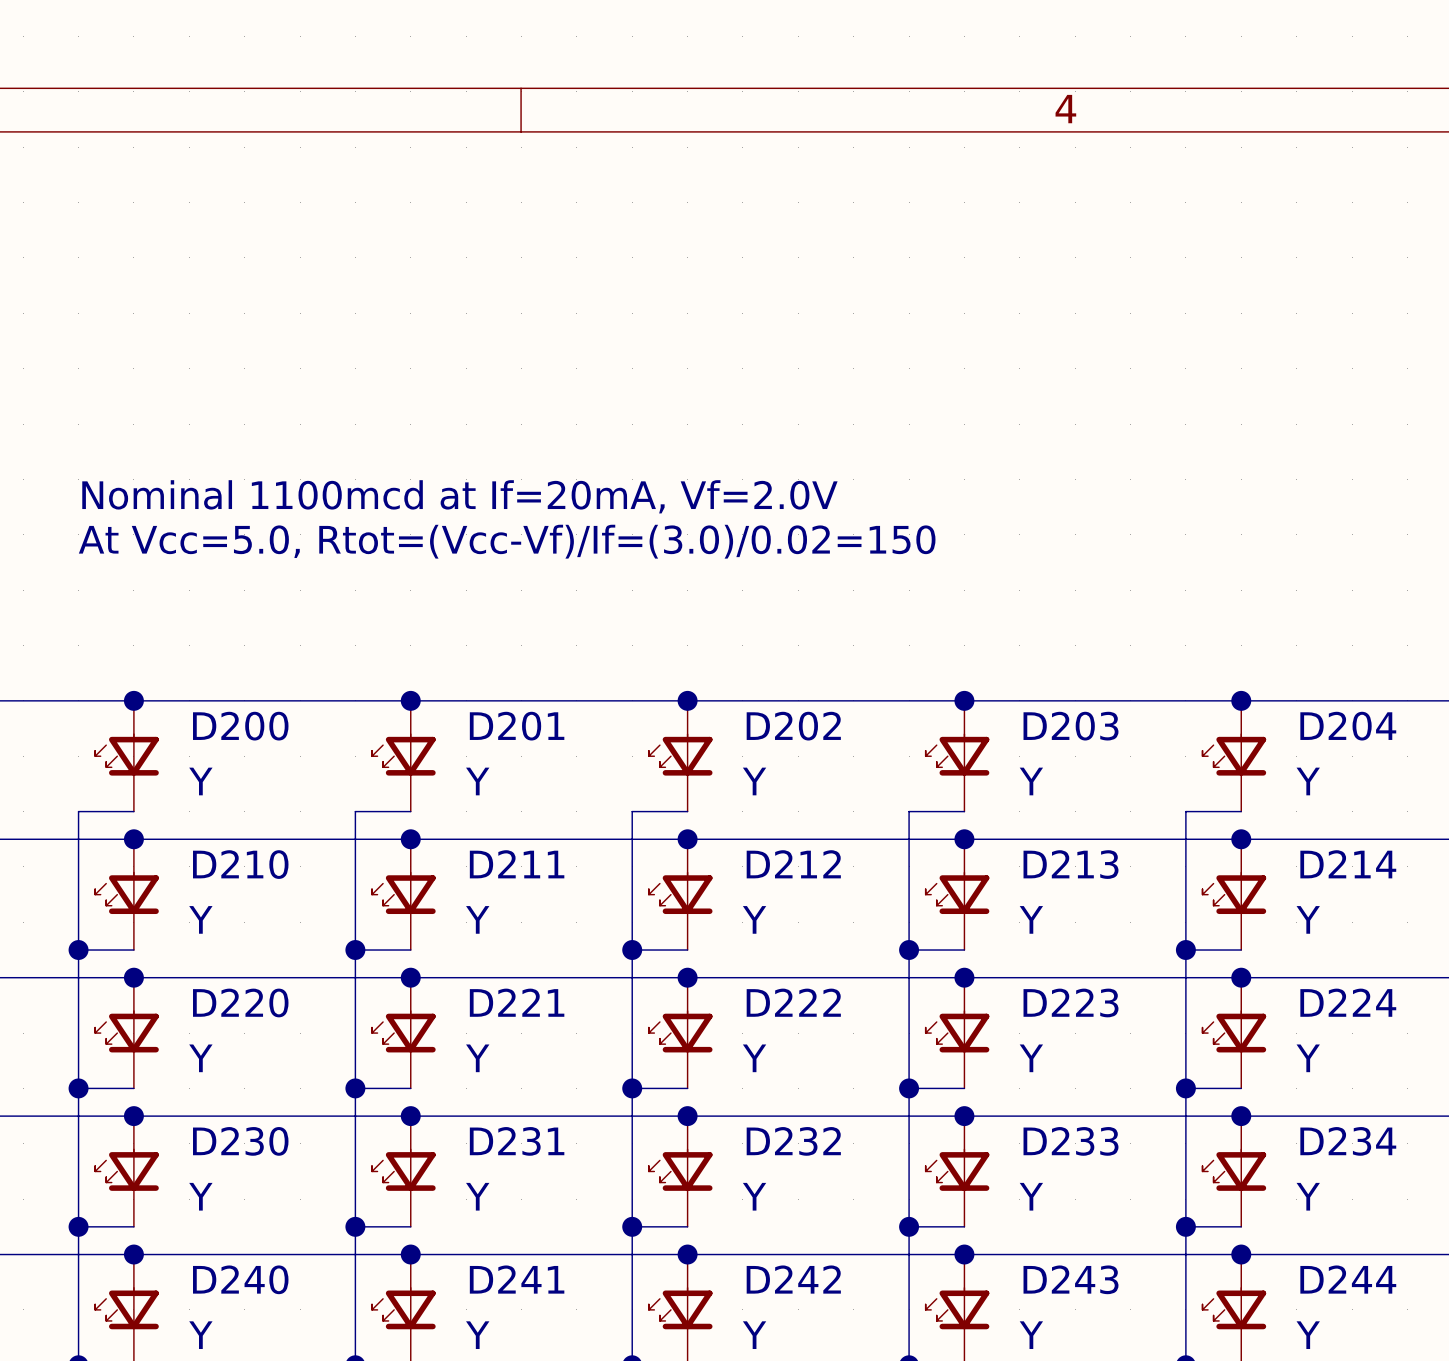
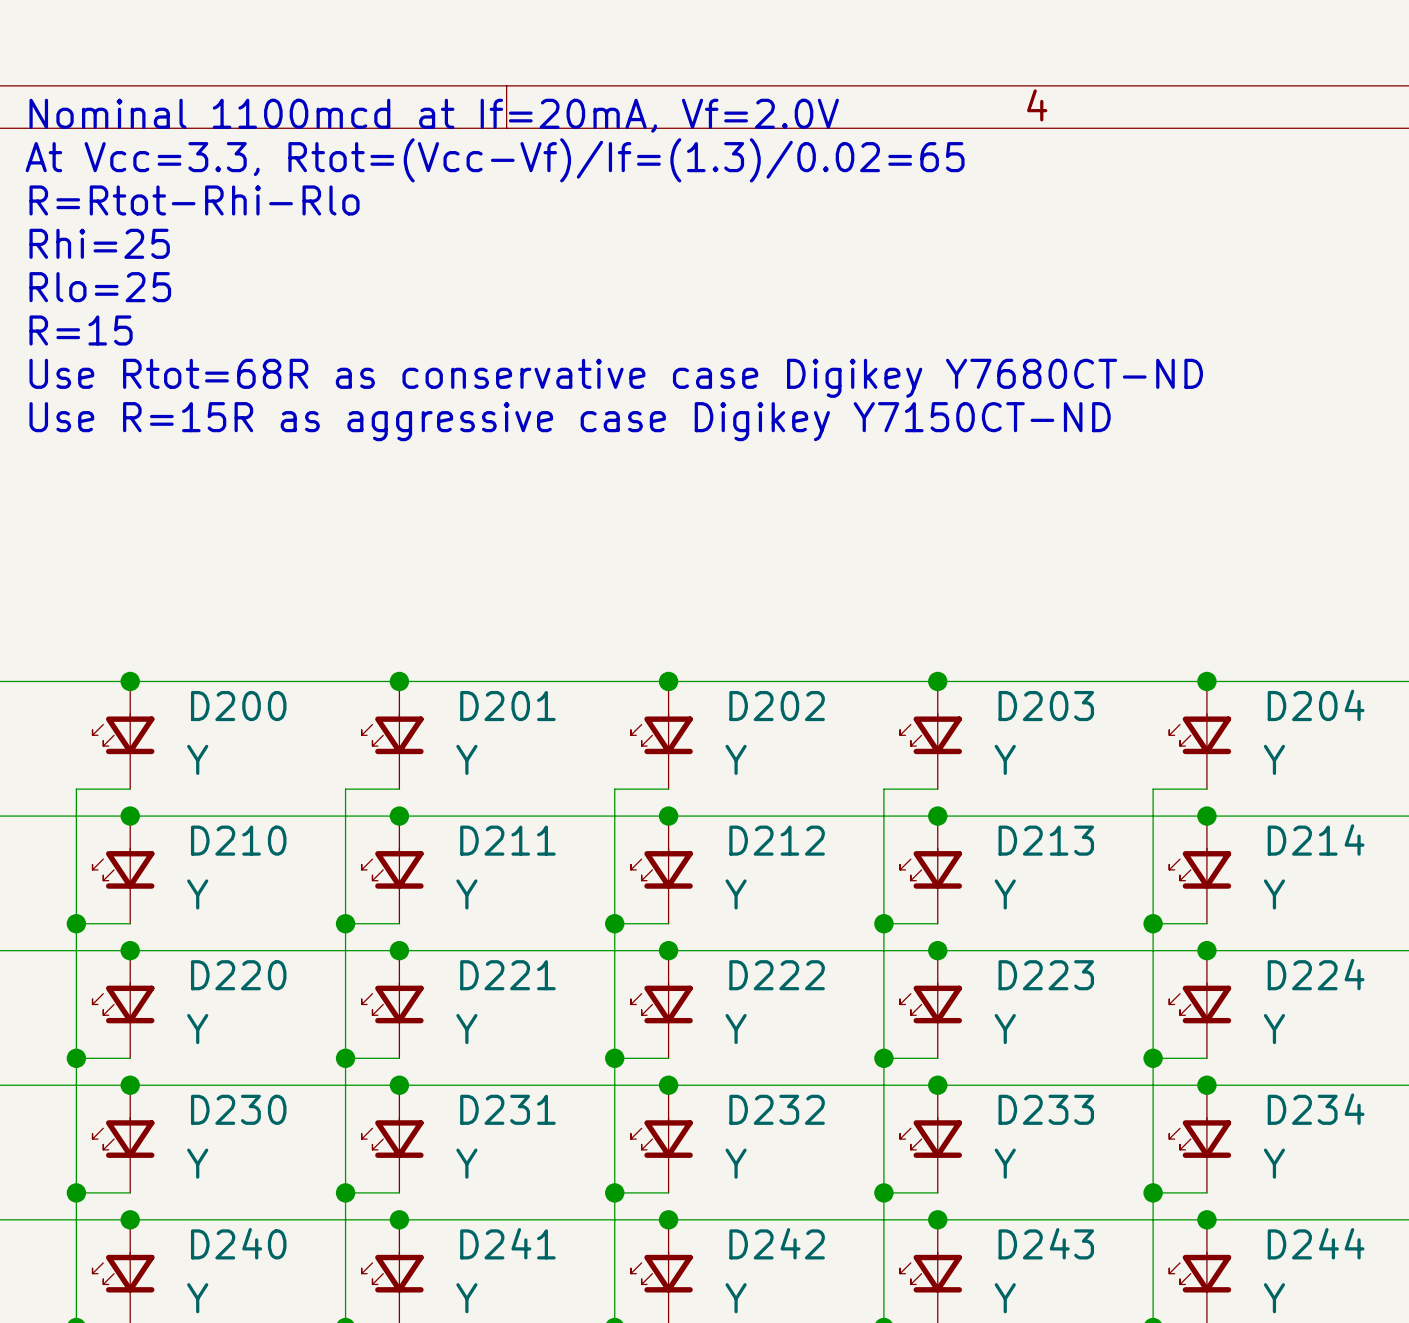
text: none -> At Vcc=3.3, Rtot=(Vcc-Vf)/If=(1.3)/0.02=65 (495, 160)
text: none -> R=Rtot-Rhi-Rlo (194, 200)
text: none -> Rhi=25 (99, 243)
text: none -> Rlo=25 (100, 287)
text: none -> R=15 (81, 330)
text: none -> Use Rtot=68R as conservative case Digikey Y7680CT-ND (616, 378)
text: none -> Use R=15R as aggressive case Digikey Y7150CT-ND (570, 421)
text position: Nominal 1100mcd at If=20mA, Vf=2.0V (459, 496) -> Nominal 1100mcd at If=20mA, Vf=2.0V (434, 115)
text: At Vcc=5.0, Rtot=(Vcc-Vf)/If=(3.0)/0.02=150 (507, 541) -> none

